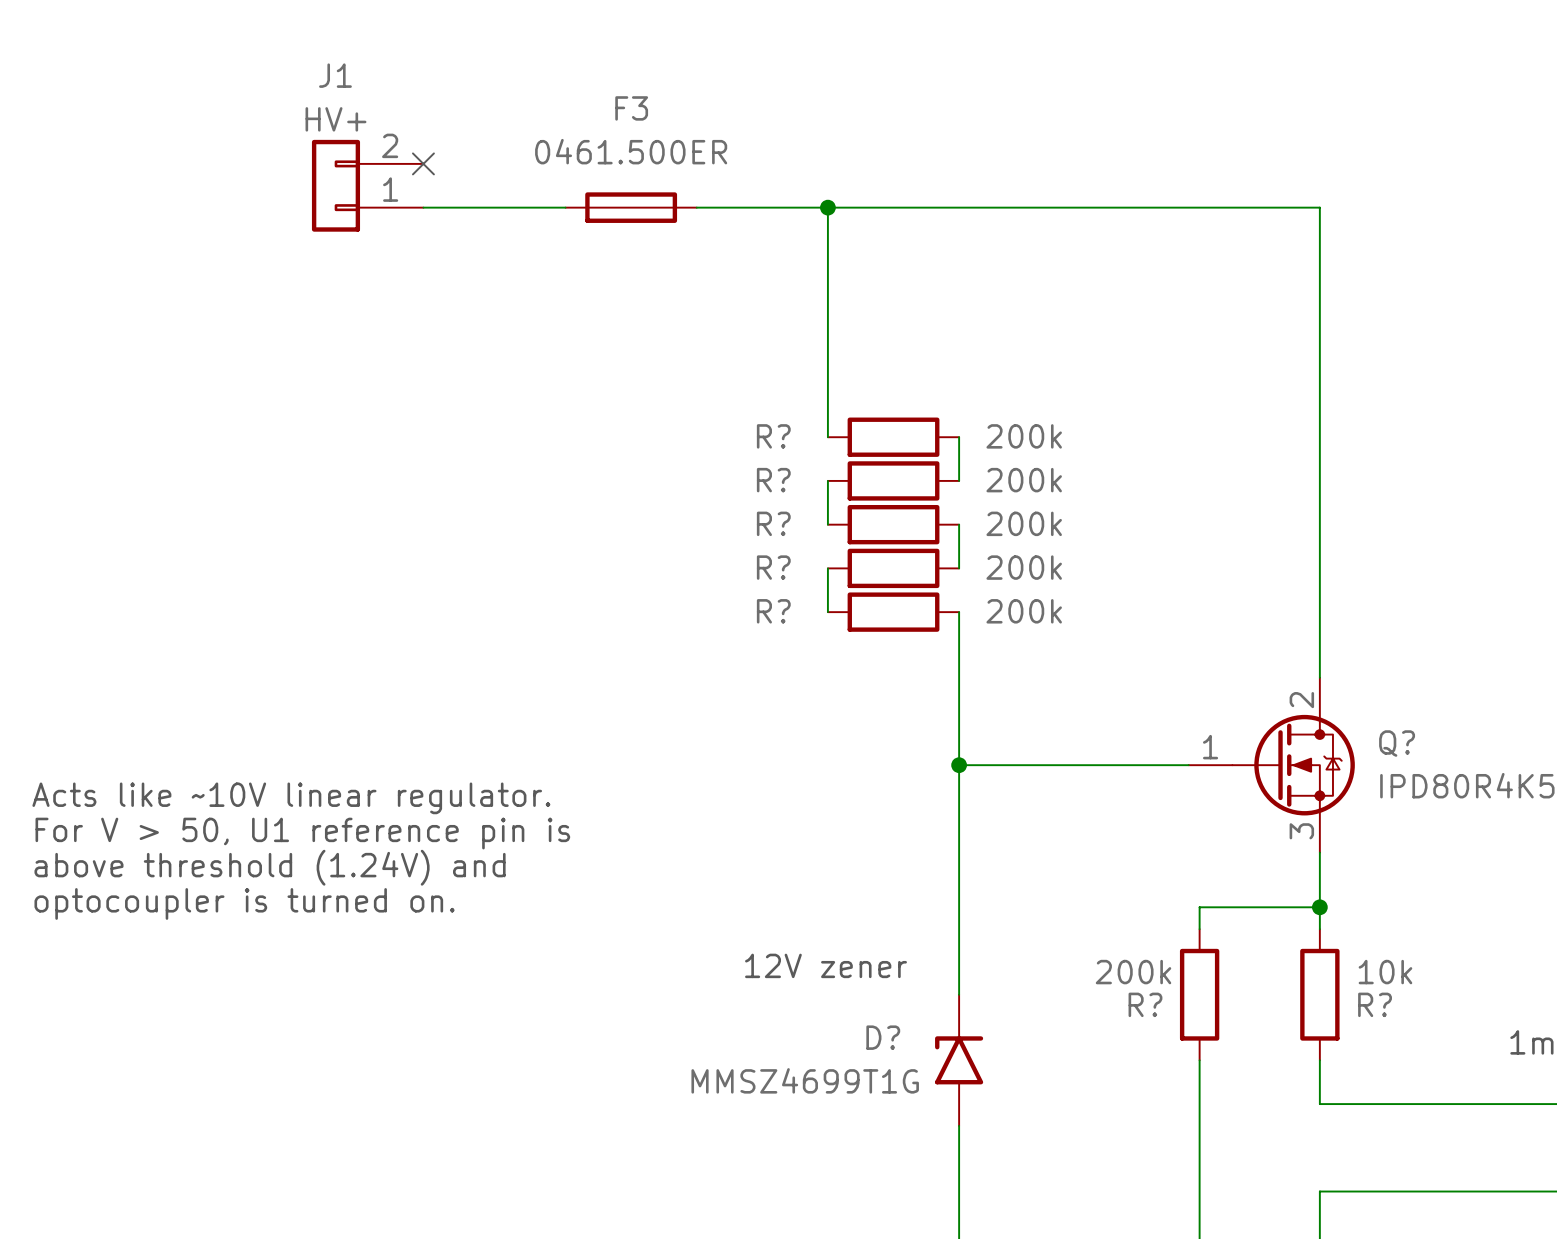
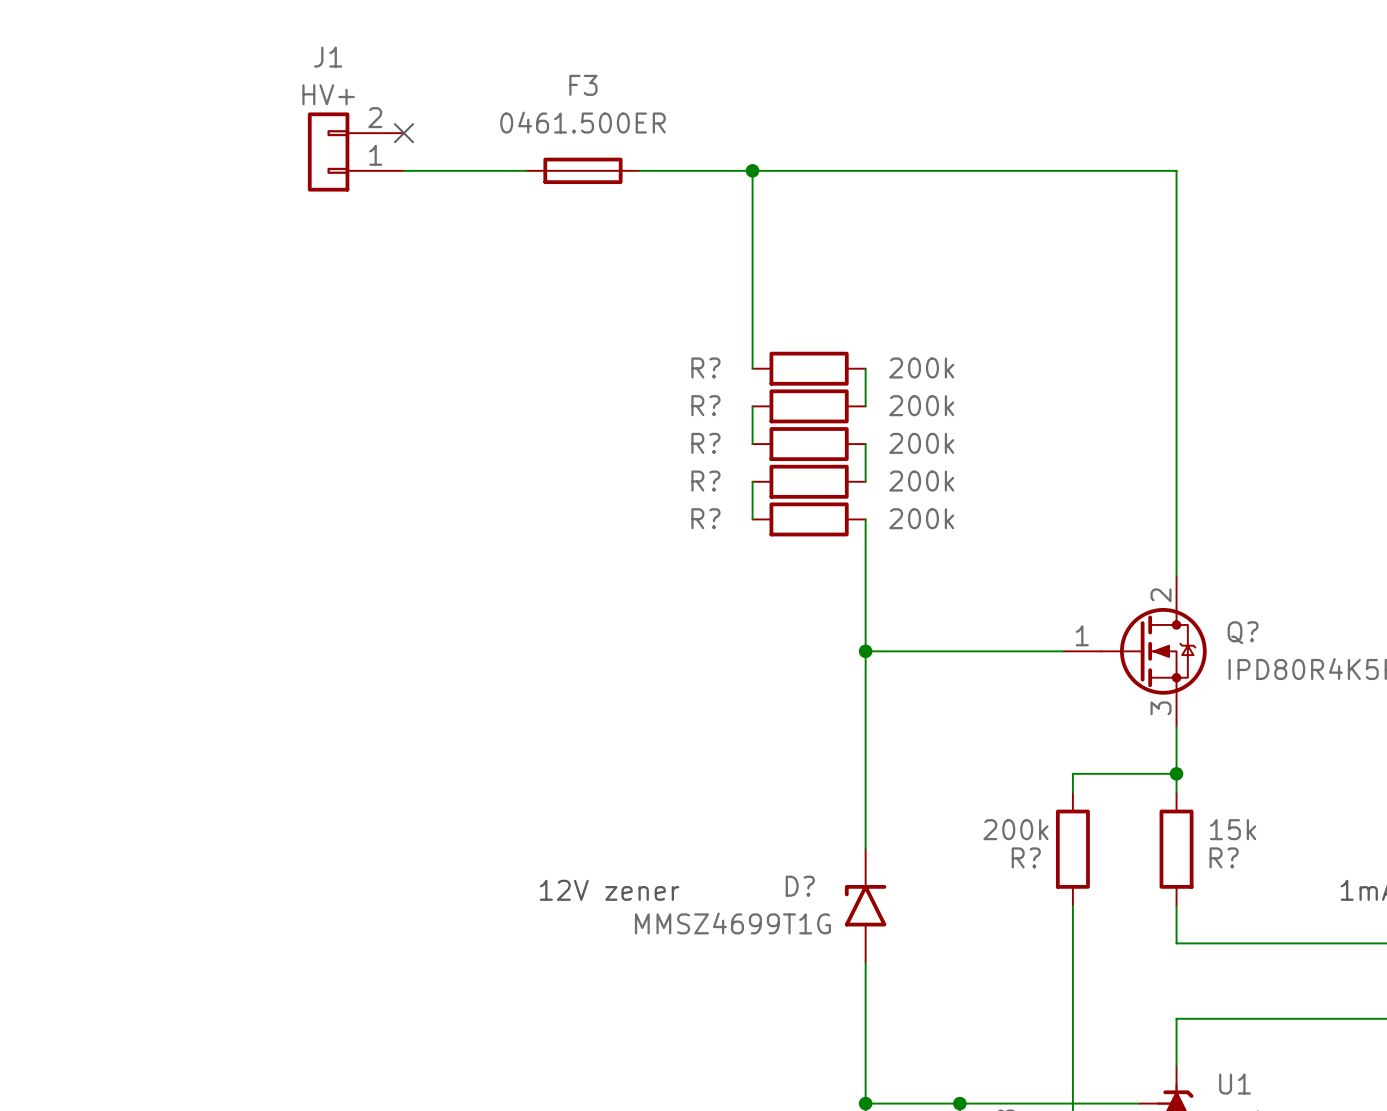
text: Acts like ~10V linear regulator. (291, 798) -> none
text: For V > 50, U1 reference pin is (302, 833) -> none
text: above threshold (1.24V) and (270, 867) -> none
text: optocoupler is turned on. (244, 903) -> none
text position: 12V zener (826, 965) -> 12V zener (609, 890)
R? value: 10k (1385, 972) -> 15k (1233, 829)

